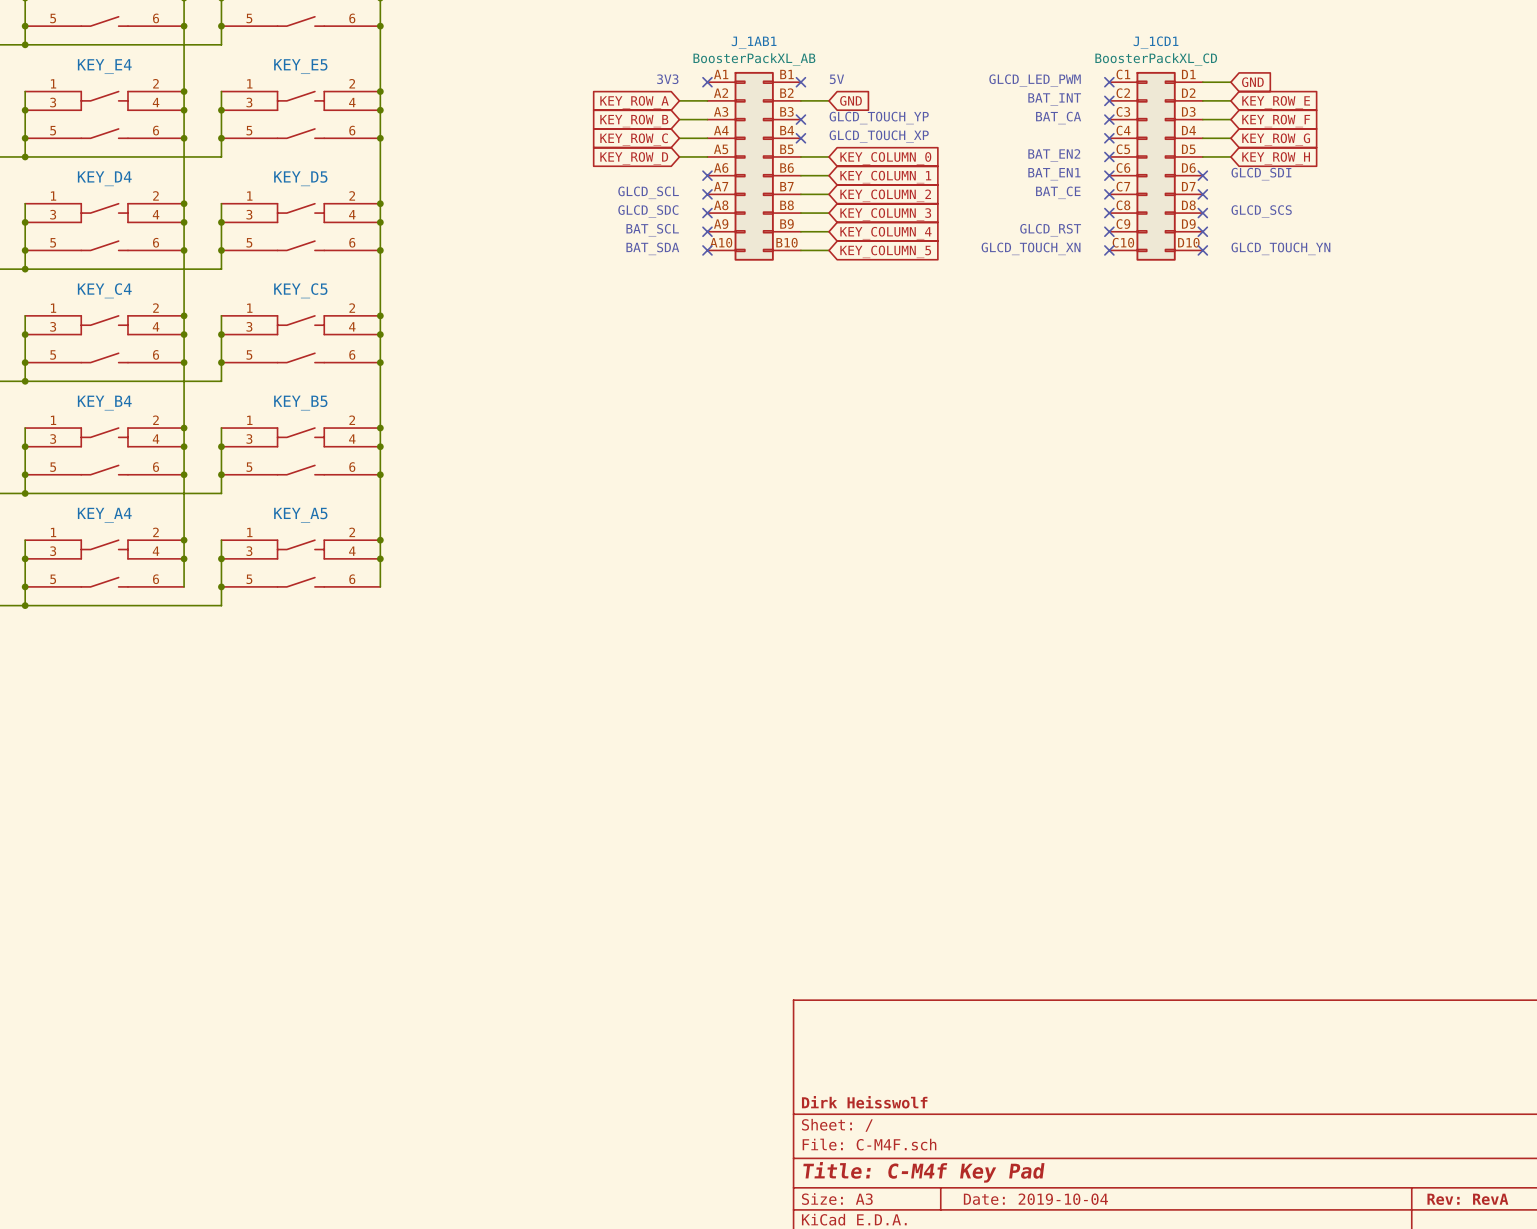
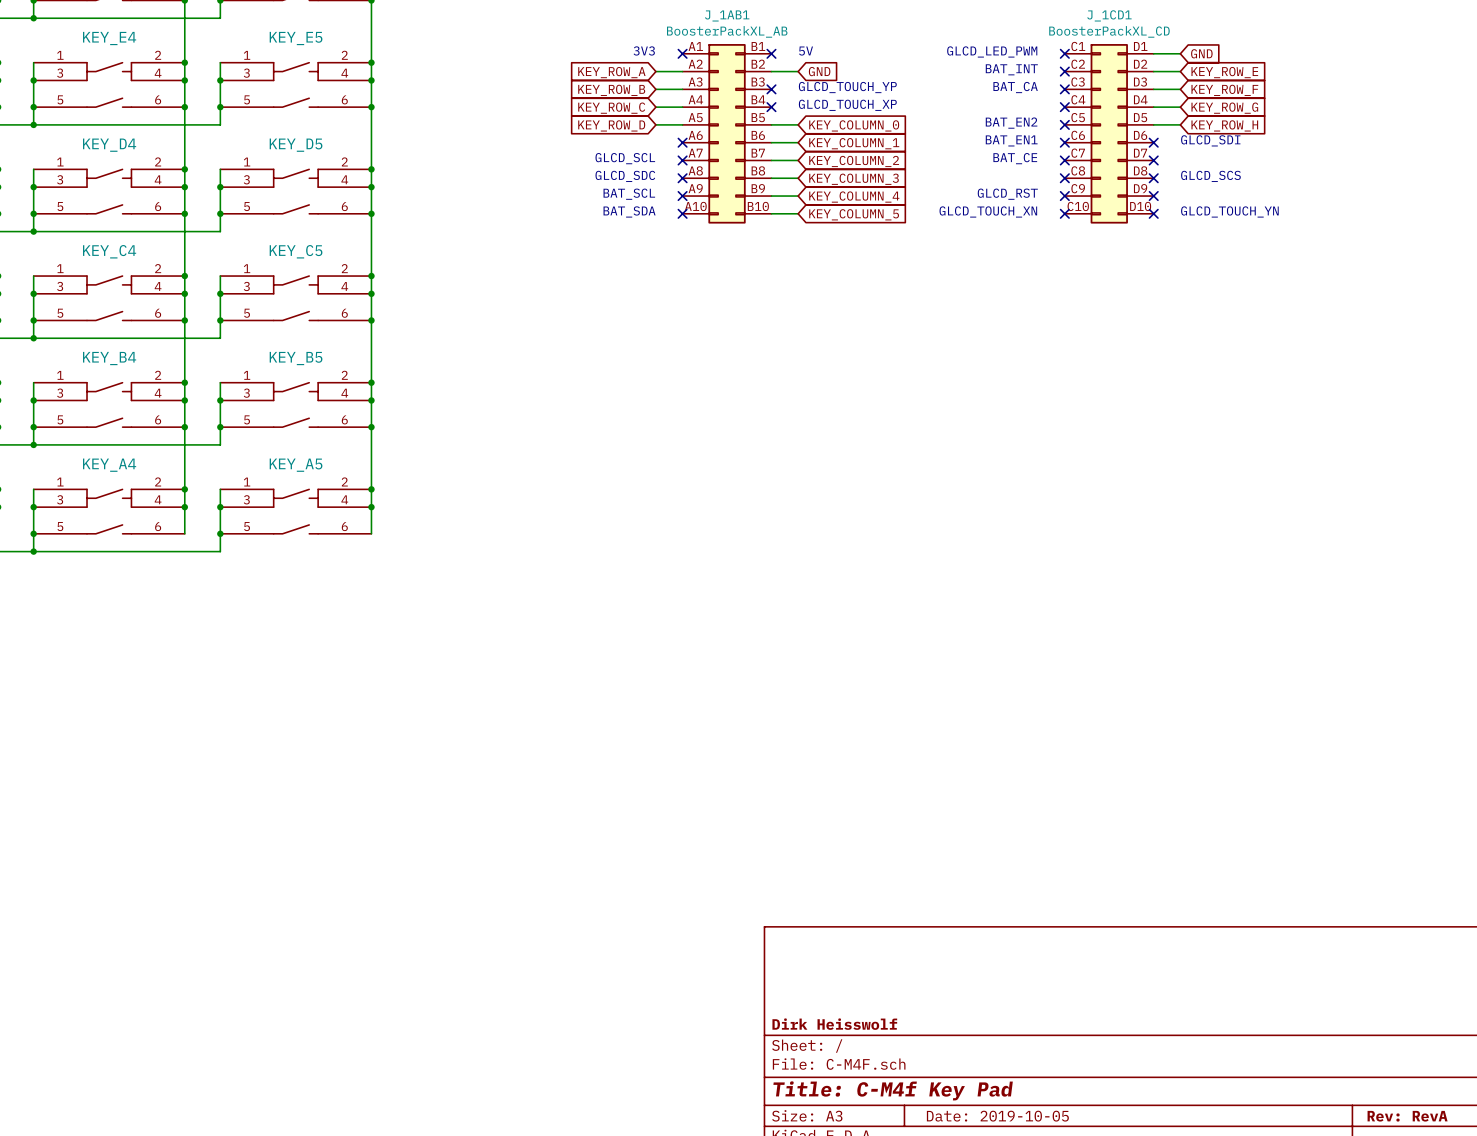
title block: Date: 2019-10-04 (1035, 1199) -> Date: 2019-10-05 (997, 1116)

